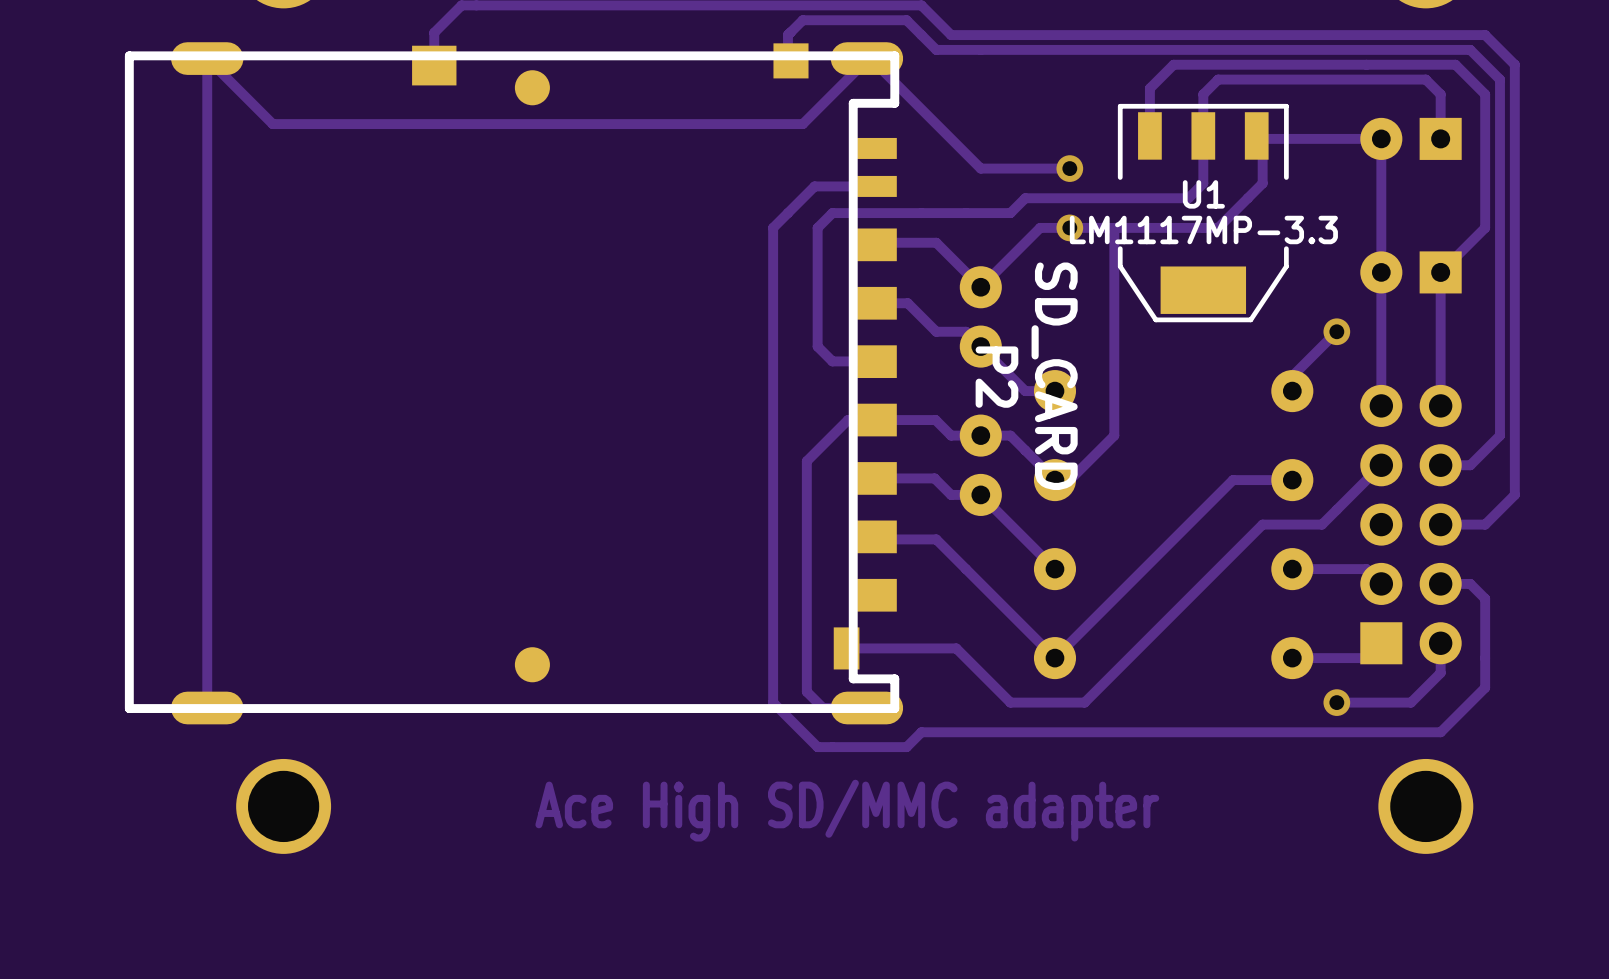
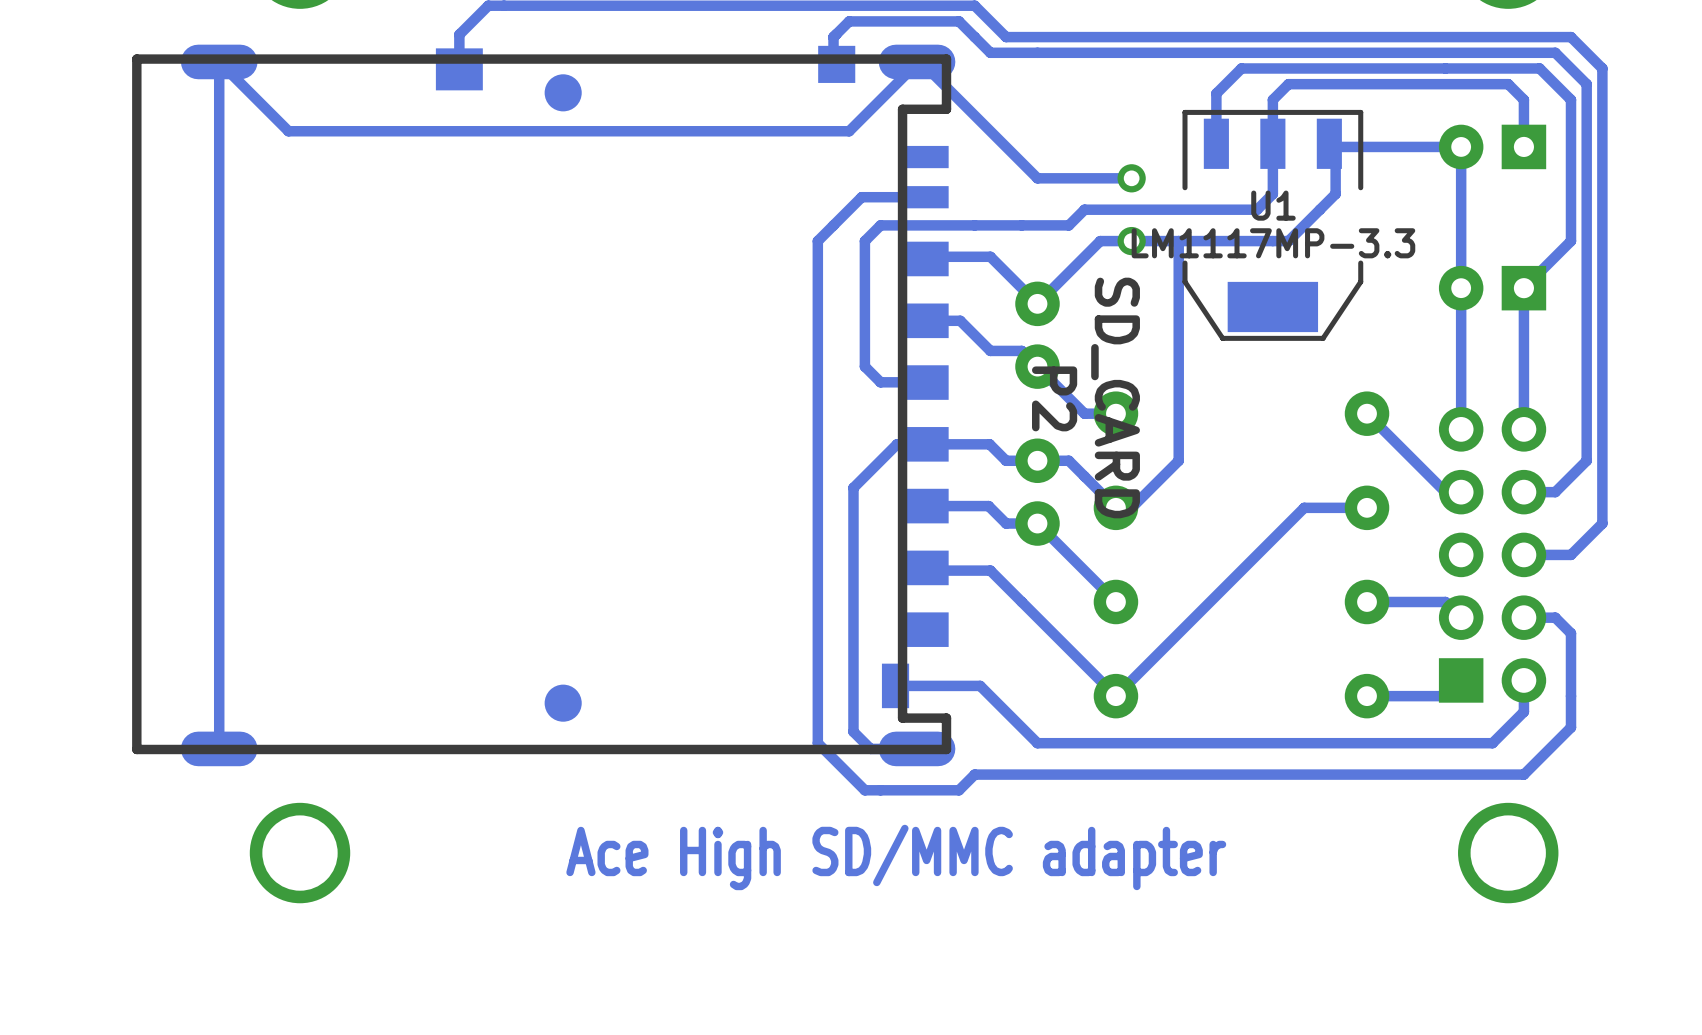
track: (1336, 331) (1292, 376) (1292, 391) -> (1461, 492) (1445, 492) (1367, 413)
via: (1336, 331) -> none
track: (1381, 465) (1321, 524) (1262, 524) (1084, 702) -> (1414, 743) (1147, 743)
track: (926, 648) (956, 648) (1010, 702) -> (980, 685) (1037, 743) (1068, 743)
via: (1336, 702) -> none

